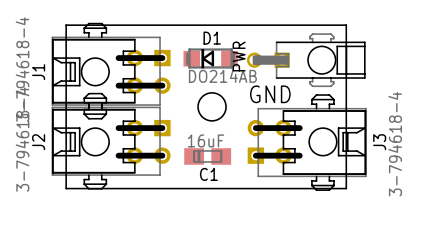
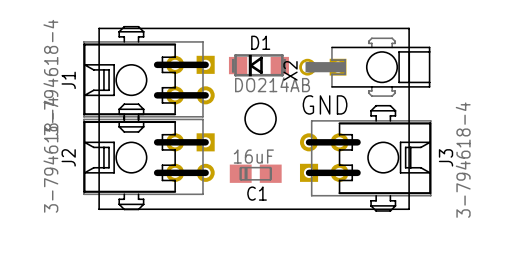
PWR name: PWR (239, 56) -> X2 (290, 70)

